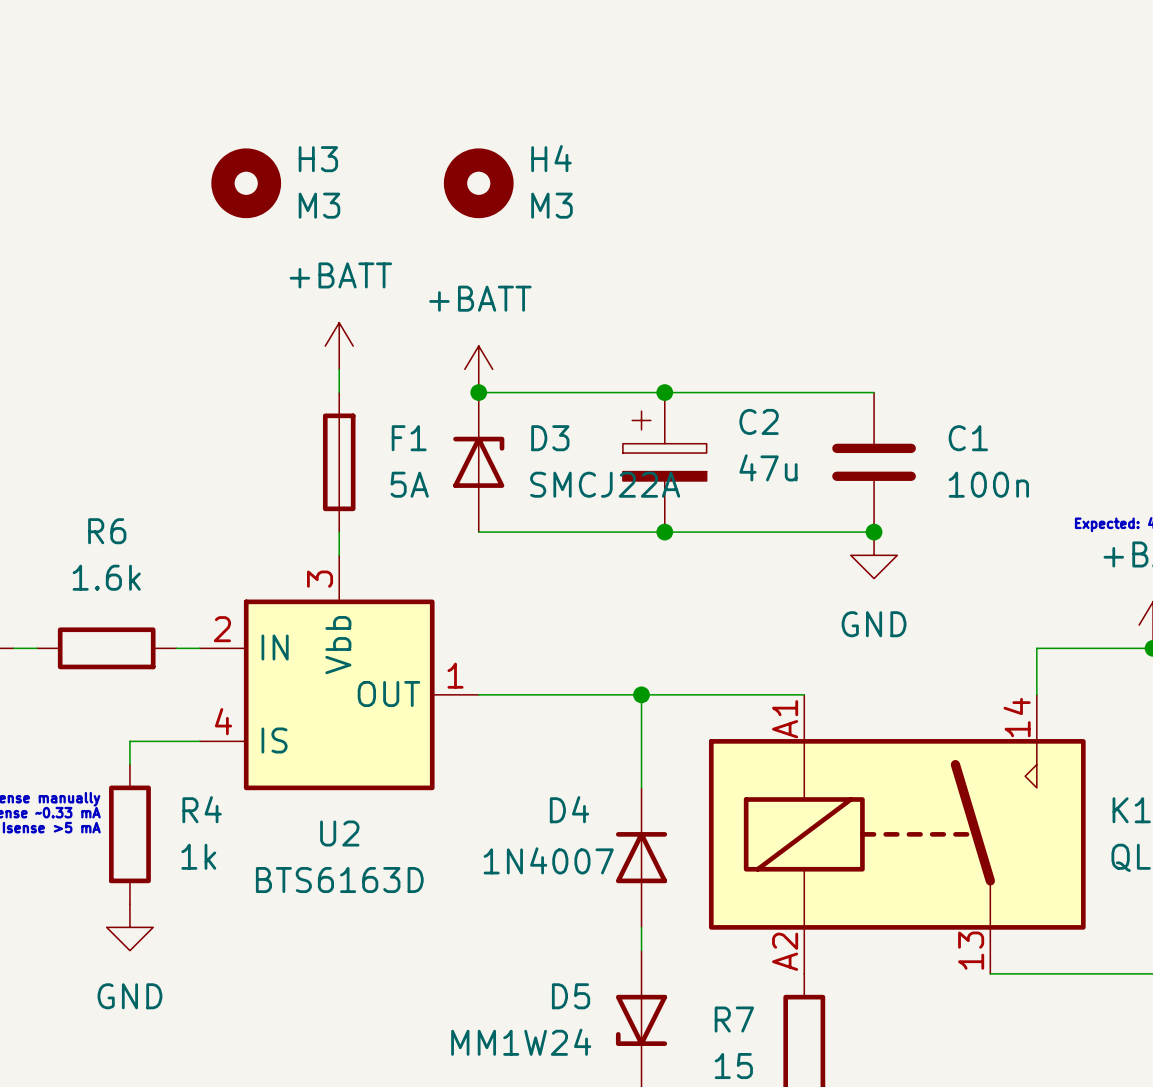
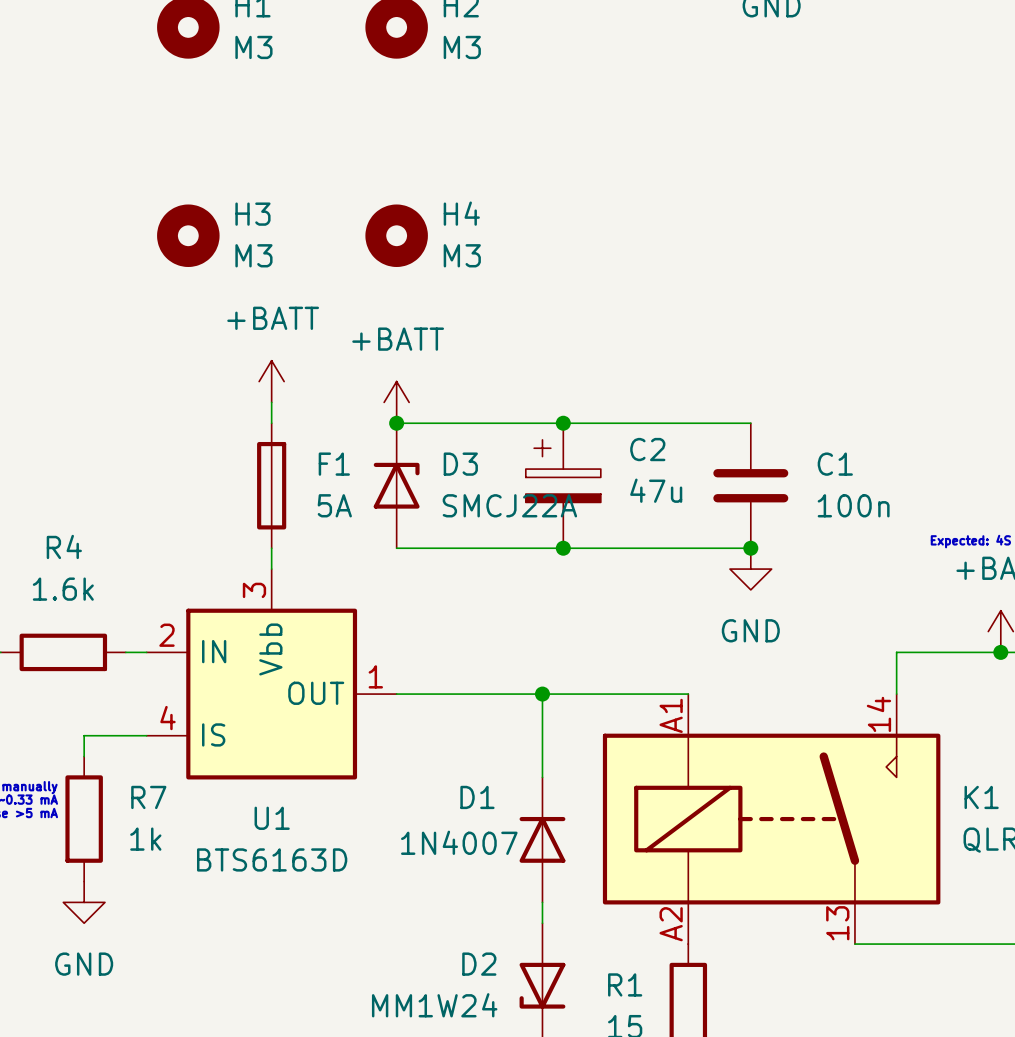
R6 name: R6 (107, 531) -> R4 (64, 546)
R4 name: R4 (202, 809) -> R7 (148, 797)
D4 name: D4 (569, 809) -> D1 (477, 797)
U2 name: U2 (339, 833) -> U1 (272, 818)
D5 name: D5 (571, 996) -> D2 (479, 964)
R7 name: R7 (734, 1019) -> R1 (625, 984)

